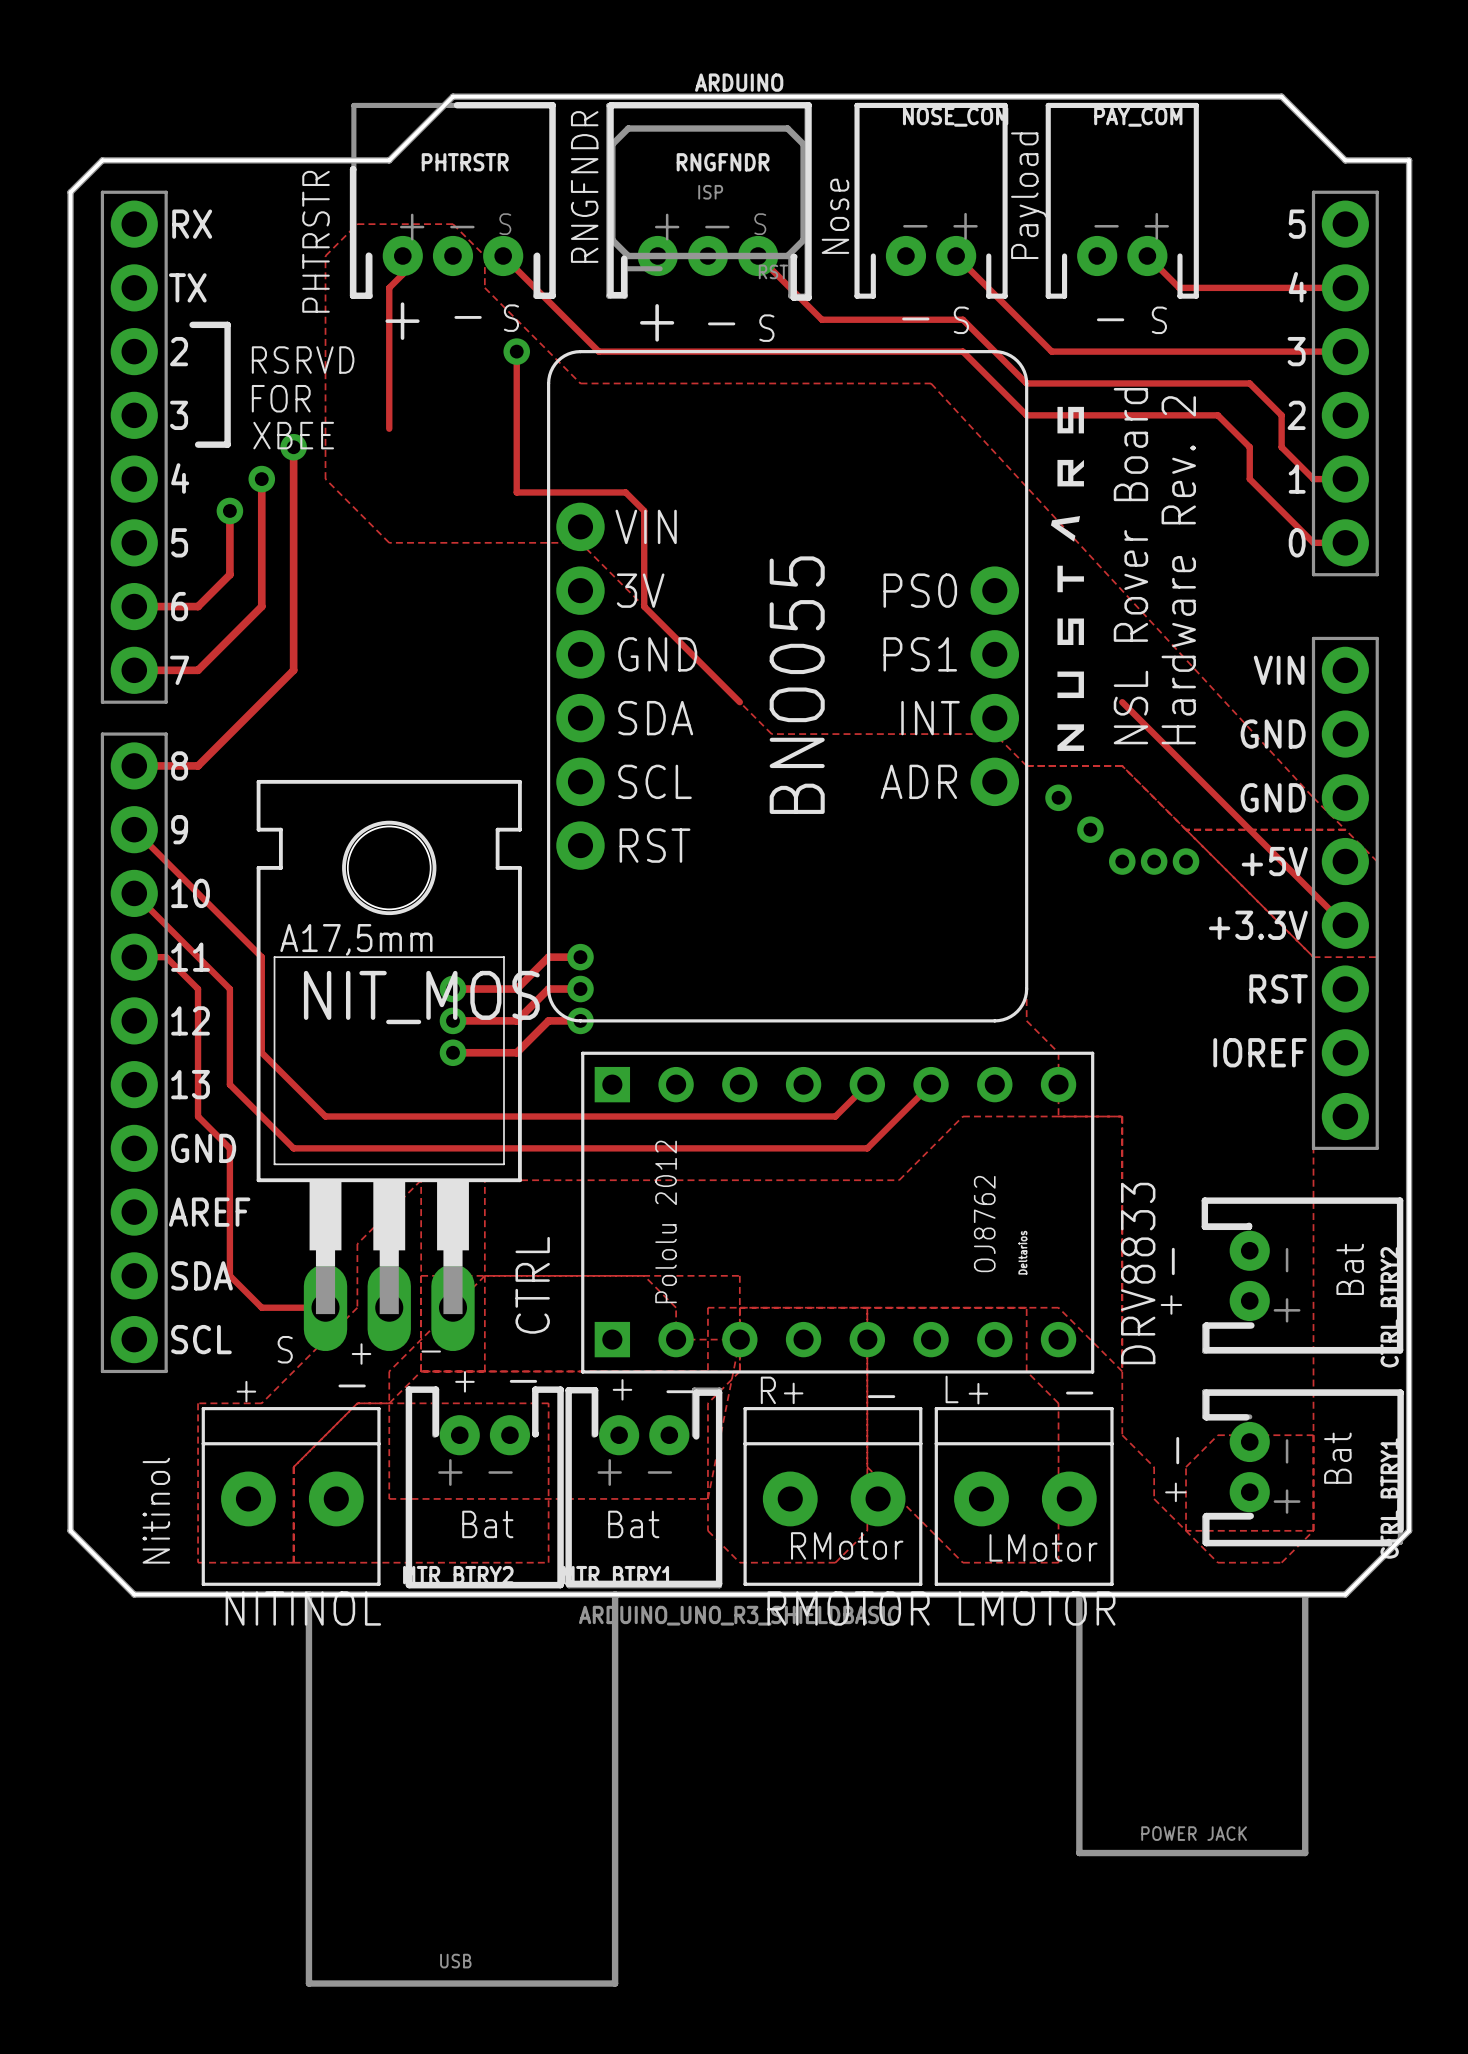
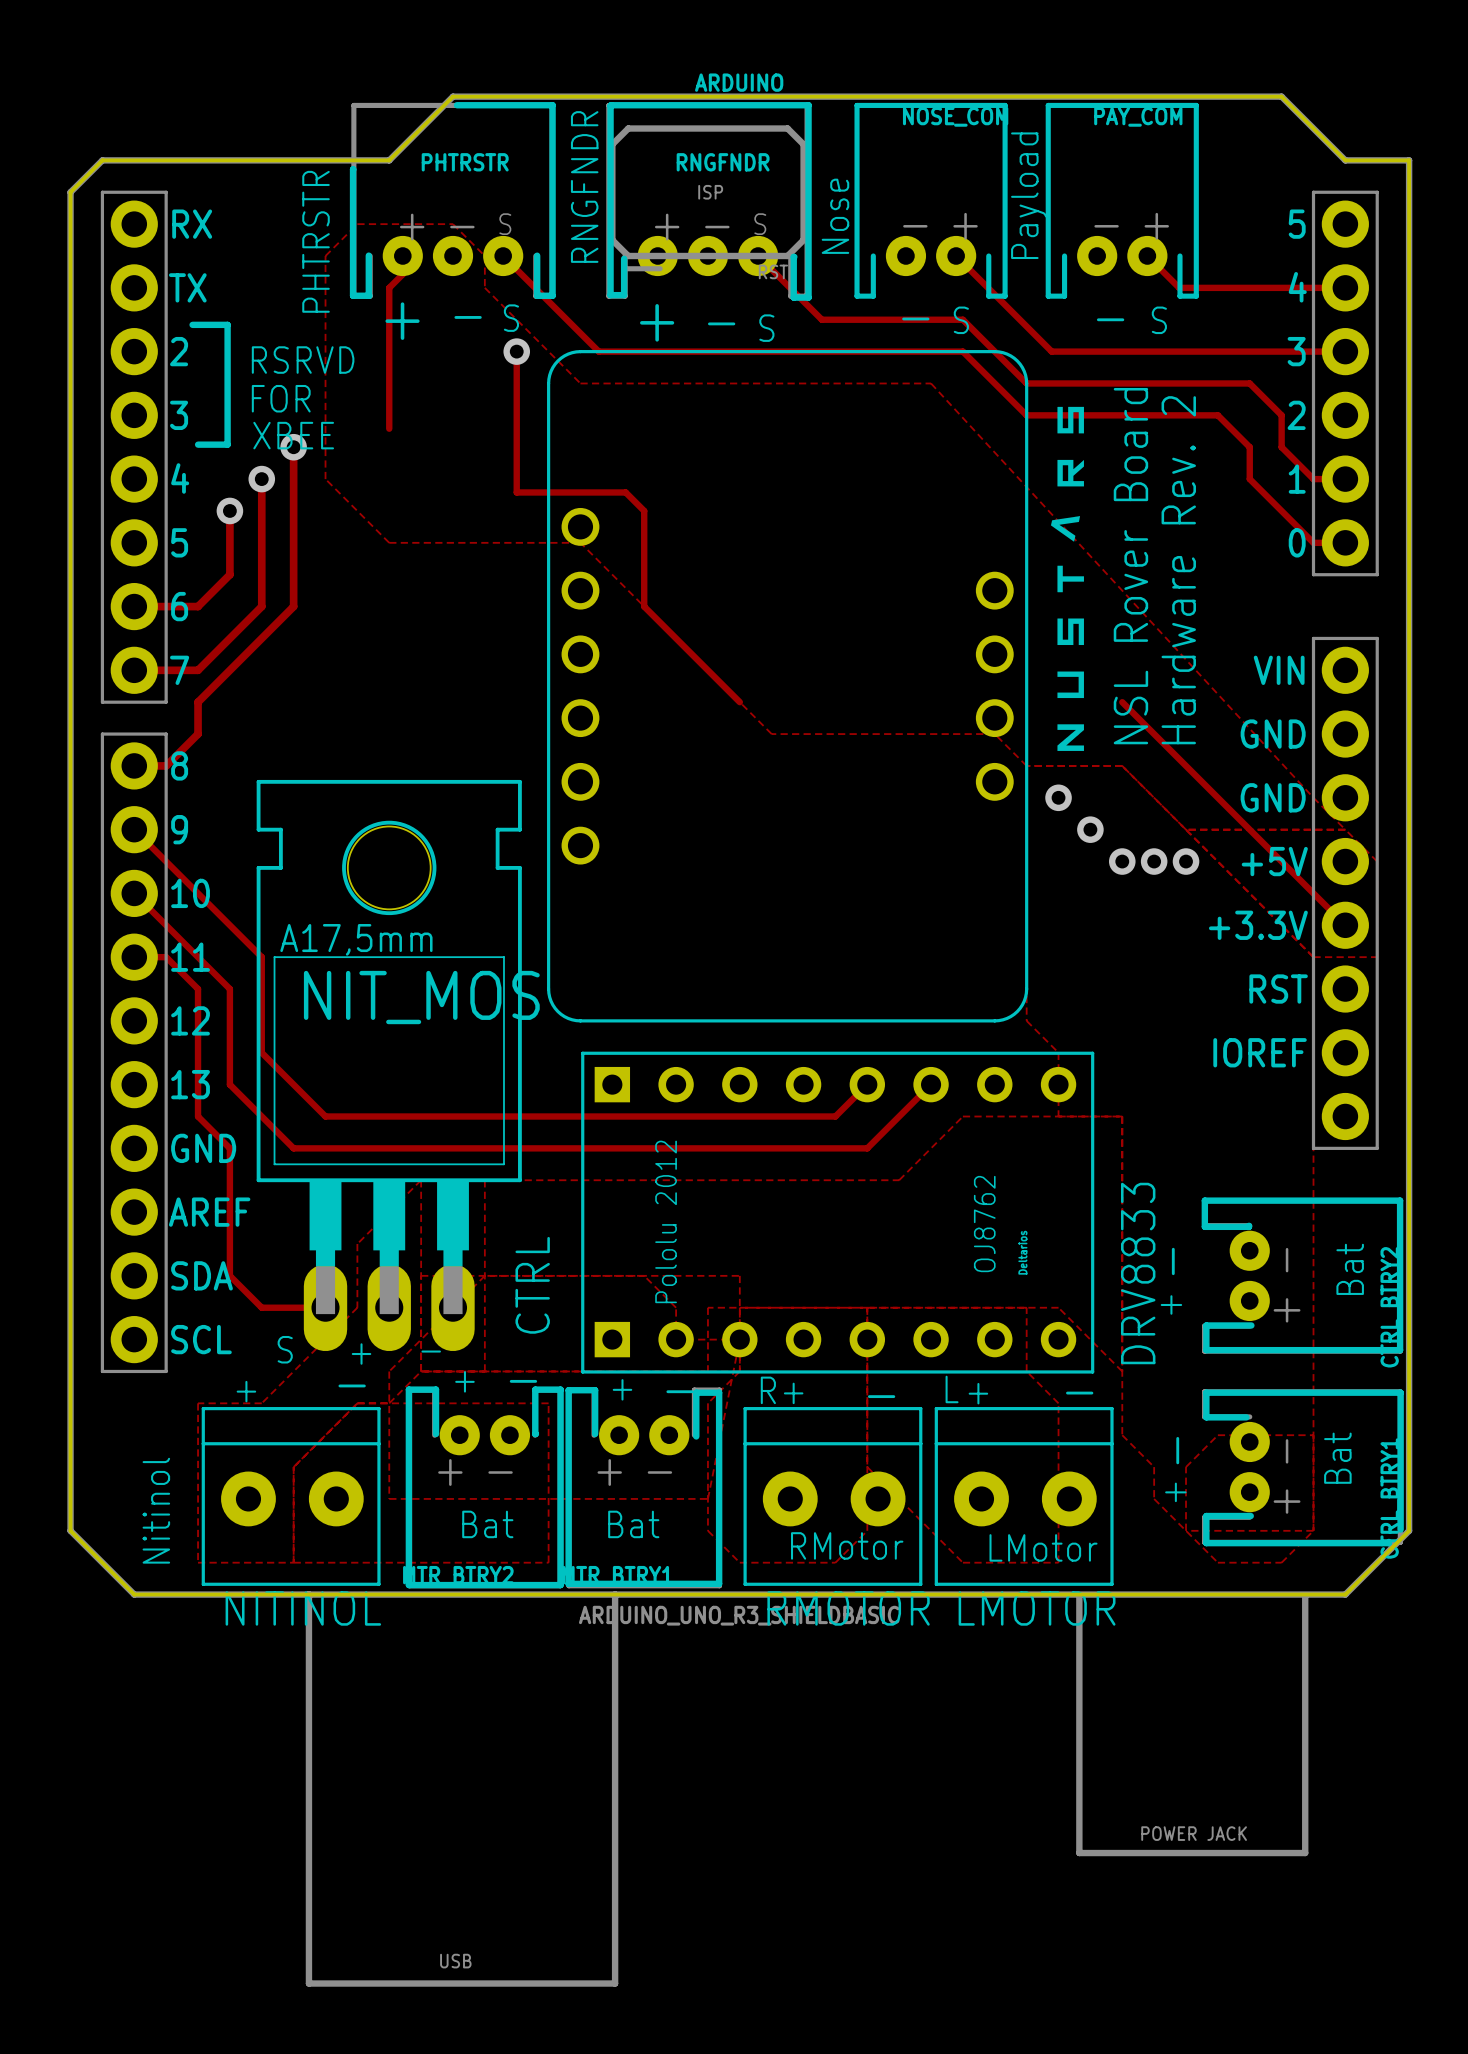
part footprint: [547, 350, 1029, 1023] -> [547, 350, 1029, 1023]
track: (293, 606) (293, 670) (198, 765) (166, 765) -> (293, 606) (198, 702) (198, 734) (166, 765)
track: (580, 957) (548, 957) (516, 989) (452, 989) -> none
via: (580, 957) -> none
via: (452, 989) -> none
track: (580, 989) (548, 989) (516, 1020) (452, 1020) -> none
via: (580, 989) -> none
via: (452, 1020) -> none
track: (580, 1020) (548, 1020) (516, 1052) (452, 1052) -> none
via: (580, 1020) -> none
via: (452, 1052) -> none

